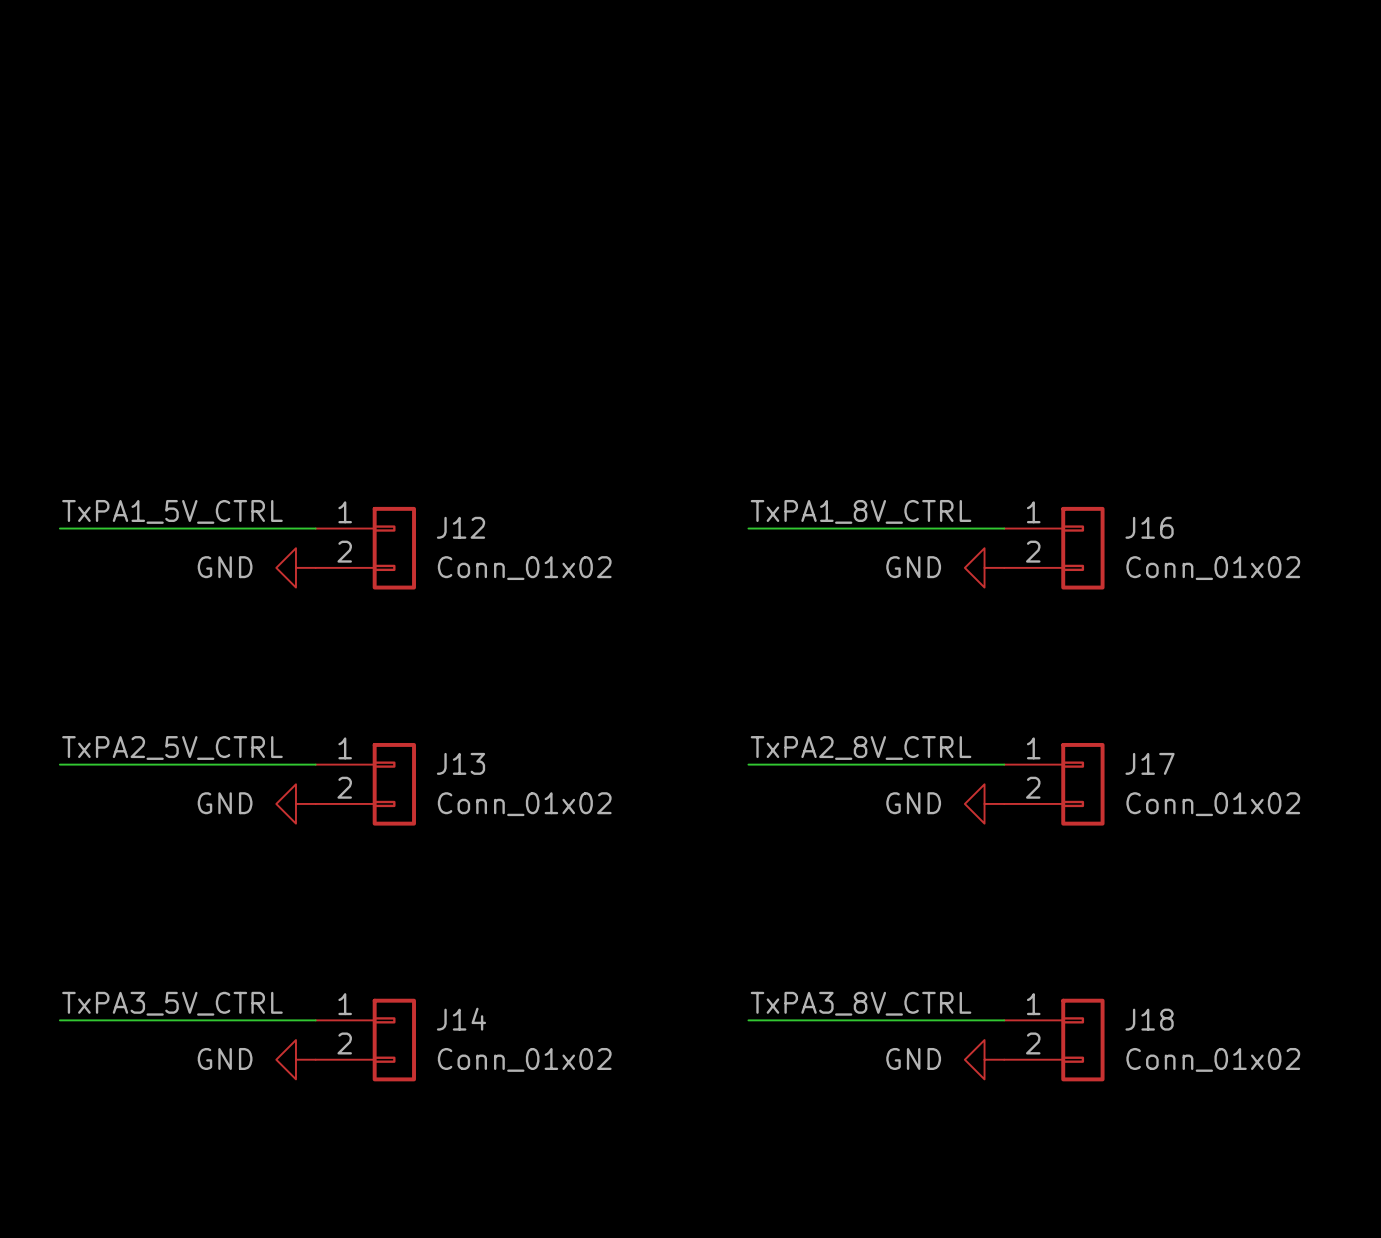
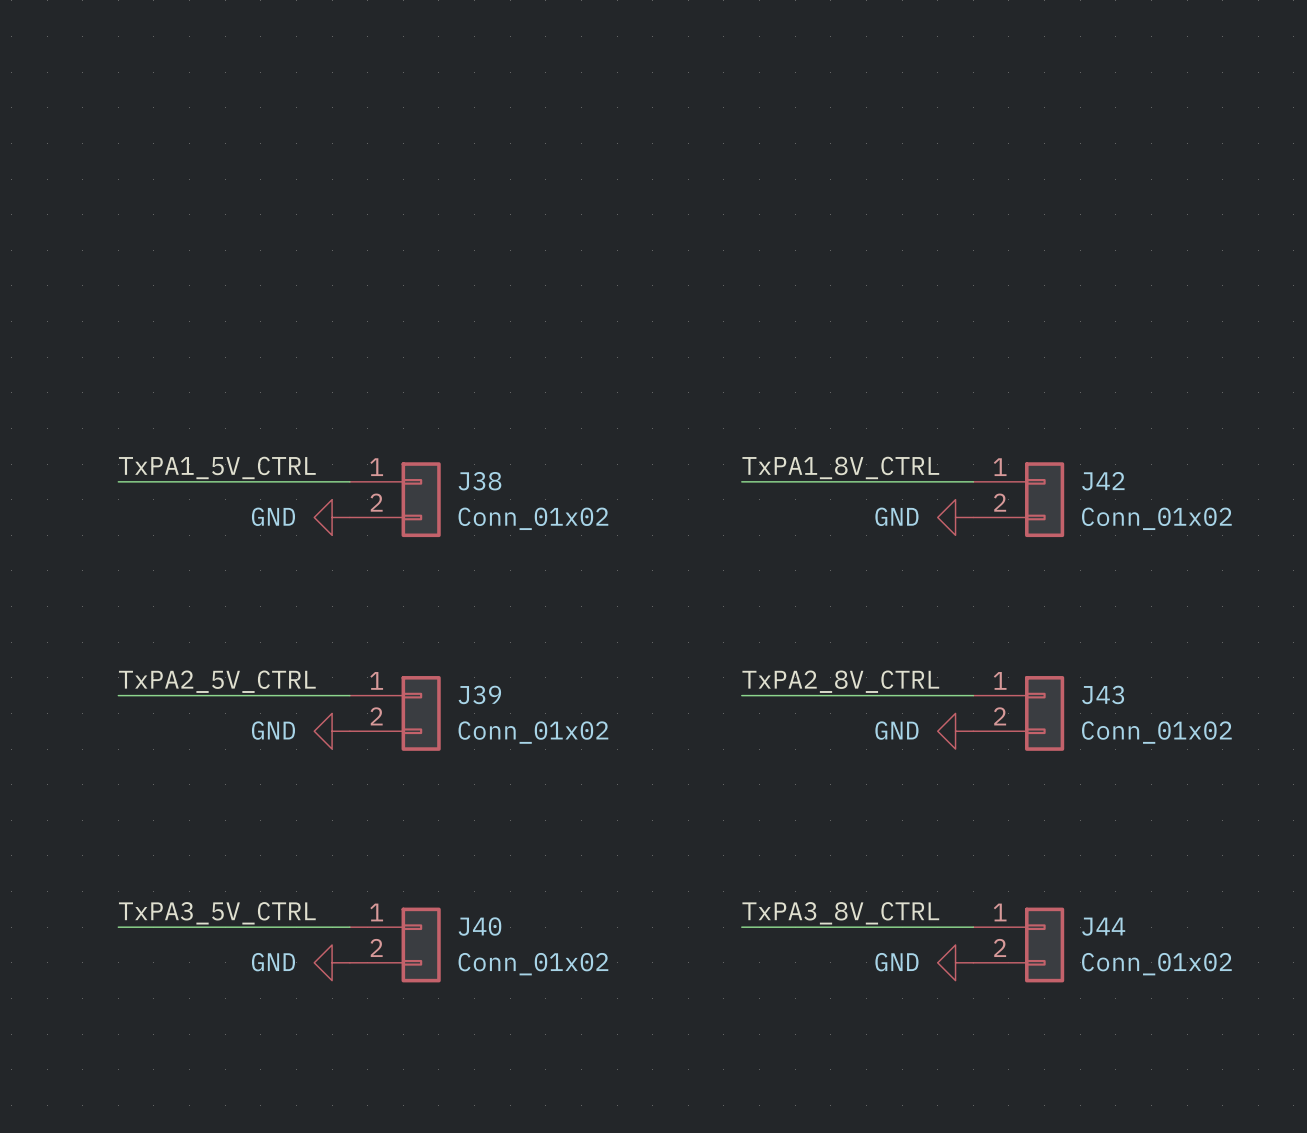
J12 name: J12 (461, 527) -> J38 (479, 481)
J16 name: J16 (1149, 527) -> J42 (1103, 481)
J13 name: J13 (461, 763) -> J39 (479, 694)
J17 name: J17 (1150, 763) -> J43 (1103, 694)
J14 name: J14 (461, 1019) -> J40 (479, 926)
J18 name: J18 (1149, 1019) -> J44 (1103, 926)

